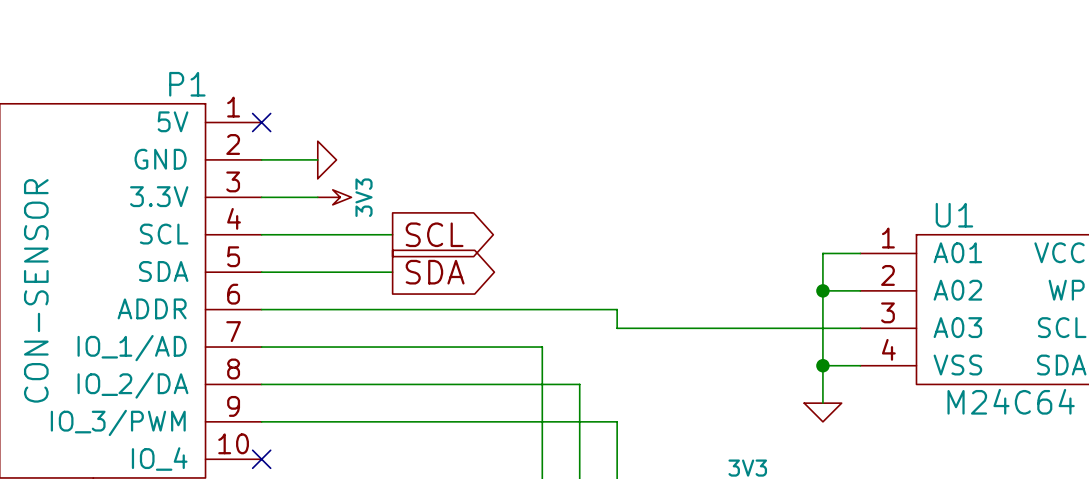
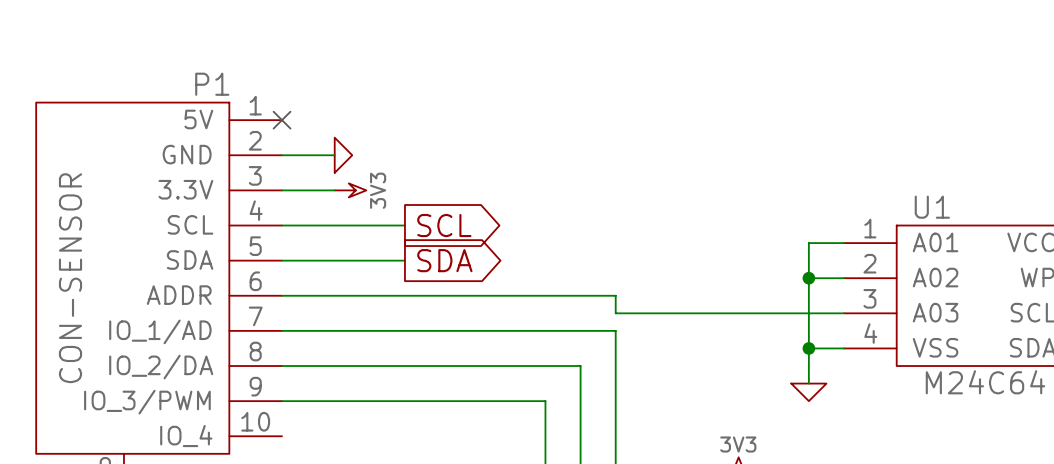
wire: (542, 347) (542, 421) (617, 421) -> (545, 330) (615, 330) (615, 401)
no-connect mark: (261, 459) -> none

